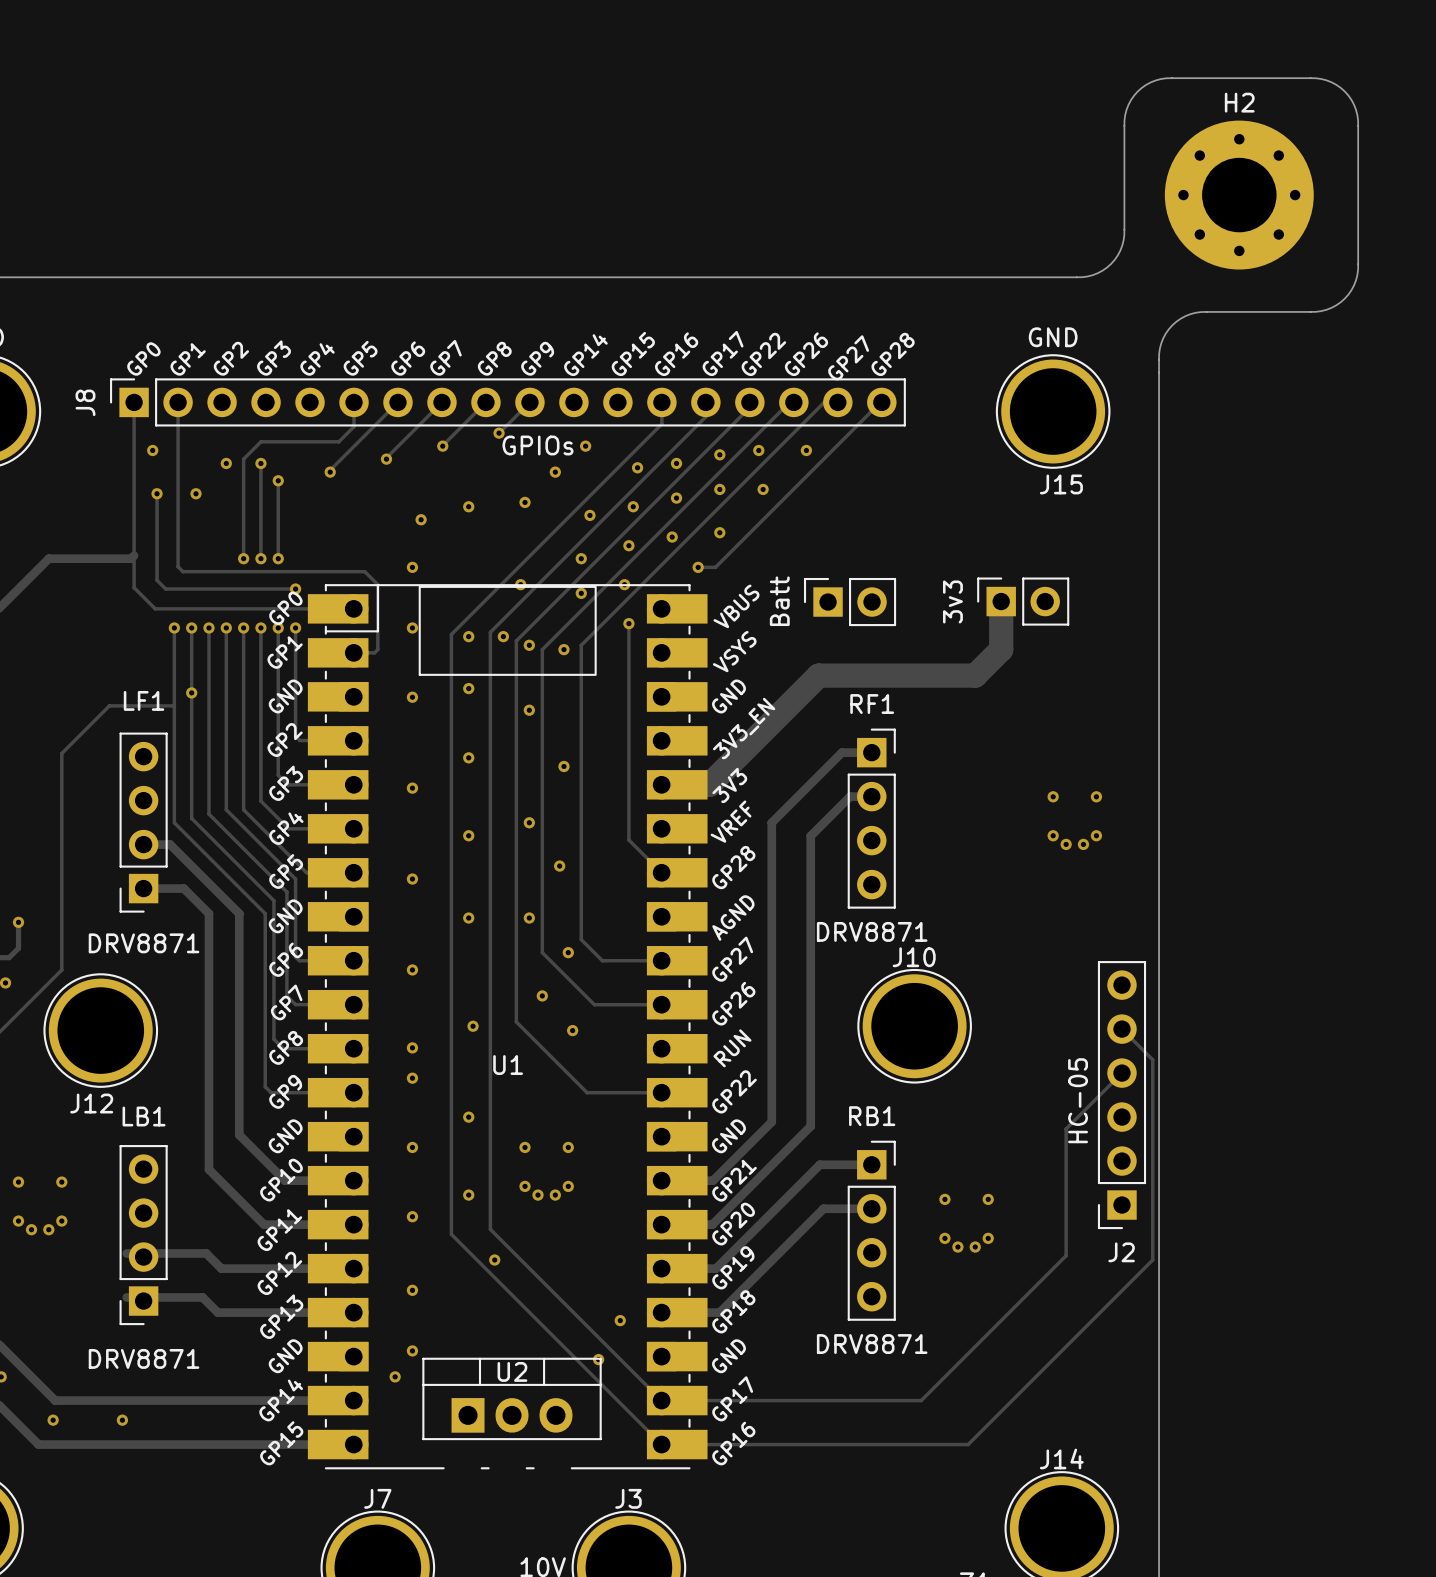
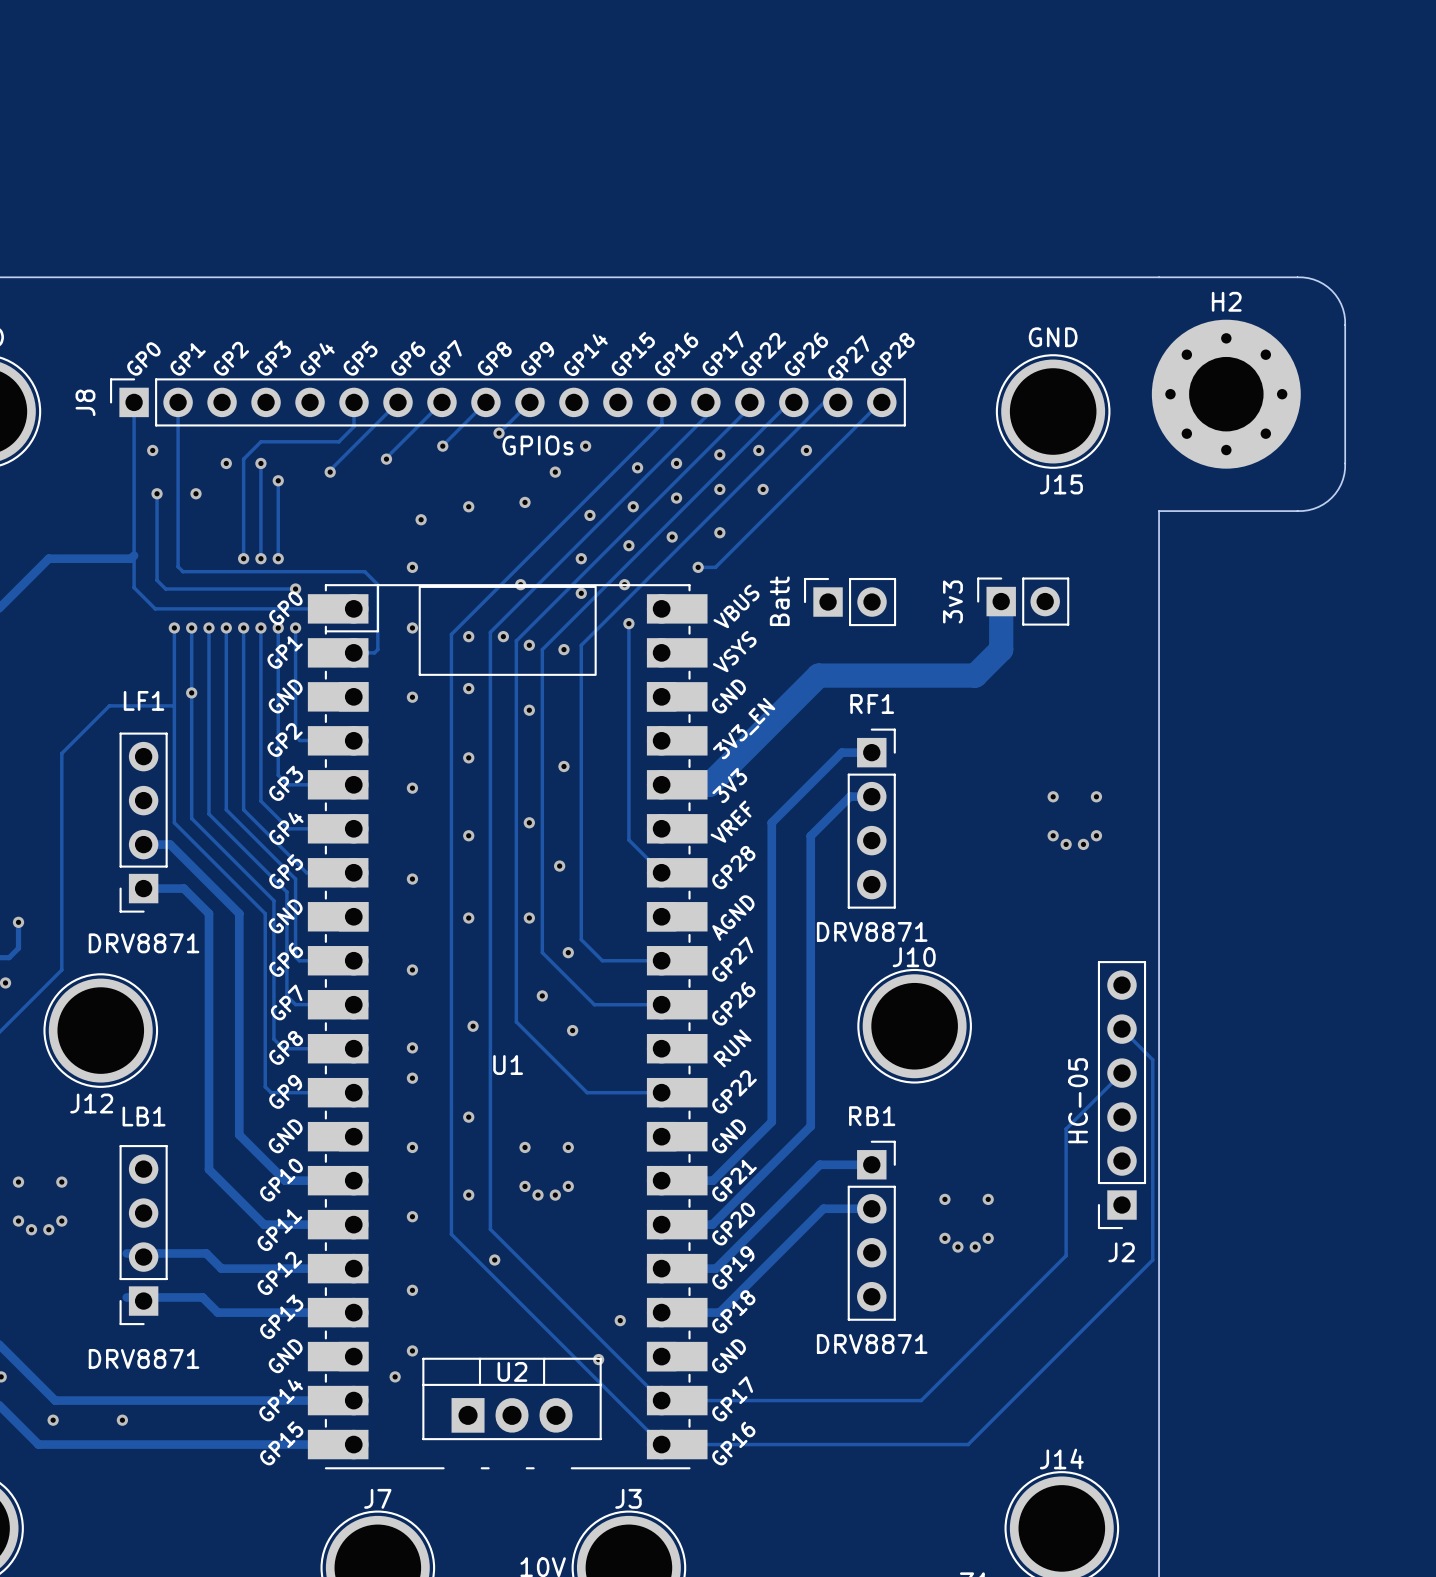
H2 position: (1239, 195) -> (1226, 394)
board edge: (1076, 277) (1092, 275) (1107, 267) (1114, 259) (1122, 245) (1124, 235) (1125, 115) (1134, 95) (1146, 84) (1166, 78) (1315, 78) (1336, 84) (1351, 99) (1356, 109) (1358, 125) (1358, 269) (1354, 285) (1340, 302) (1321, 311) (1201, 312) (1185, 316) (1168, 329) (1163, 338) (1159, 354) (1159, 511) -> (1076, 277) (1302, 277) (1313, 279) (1327, 287) (1335, 294) (1343, 308) (1345, 324) (1345, 468) (1341, 484) (1331, 497) (1318, 506) (1302, 510) (1159, 511)

